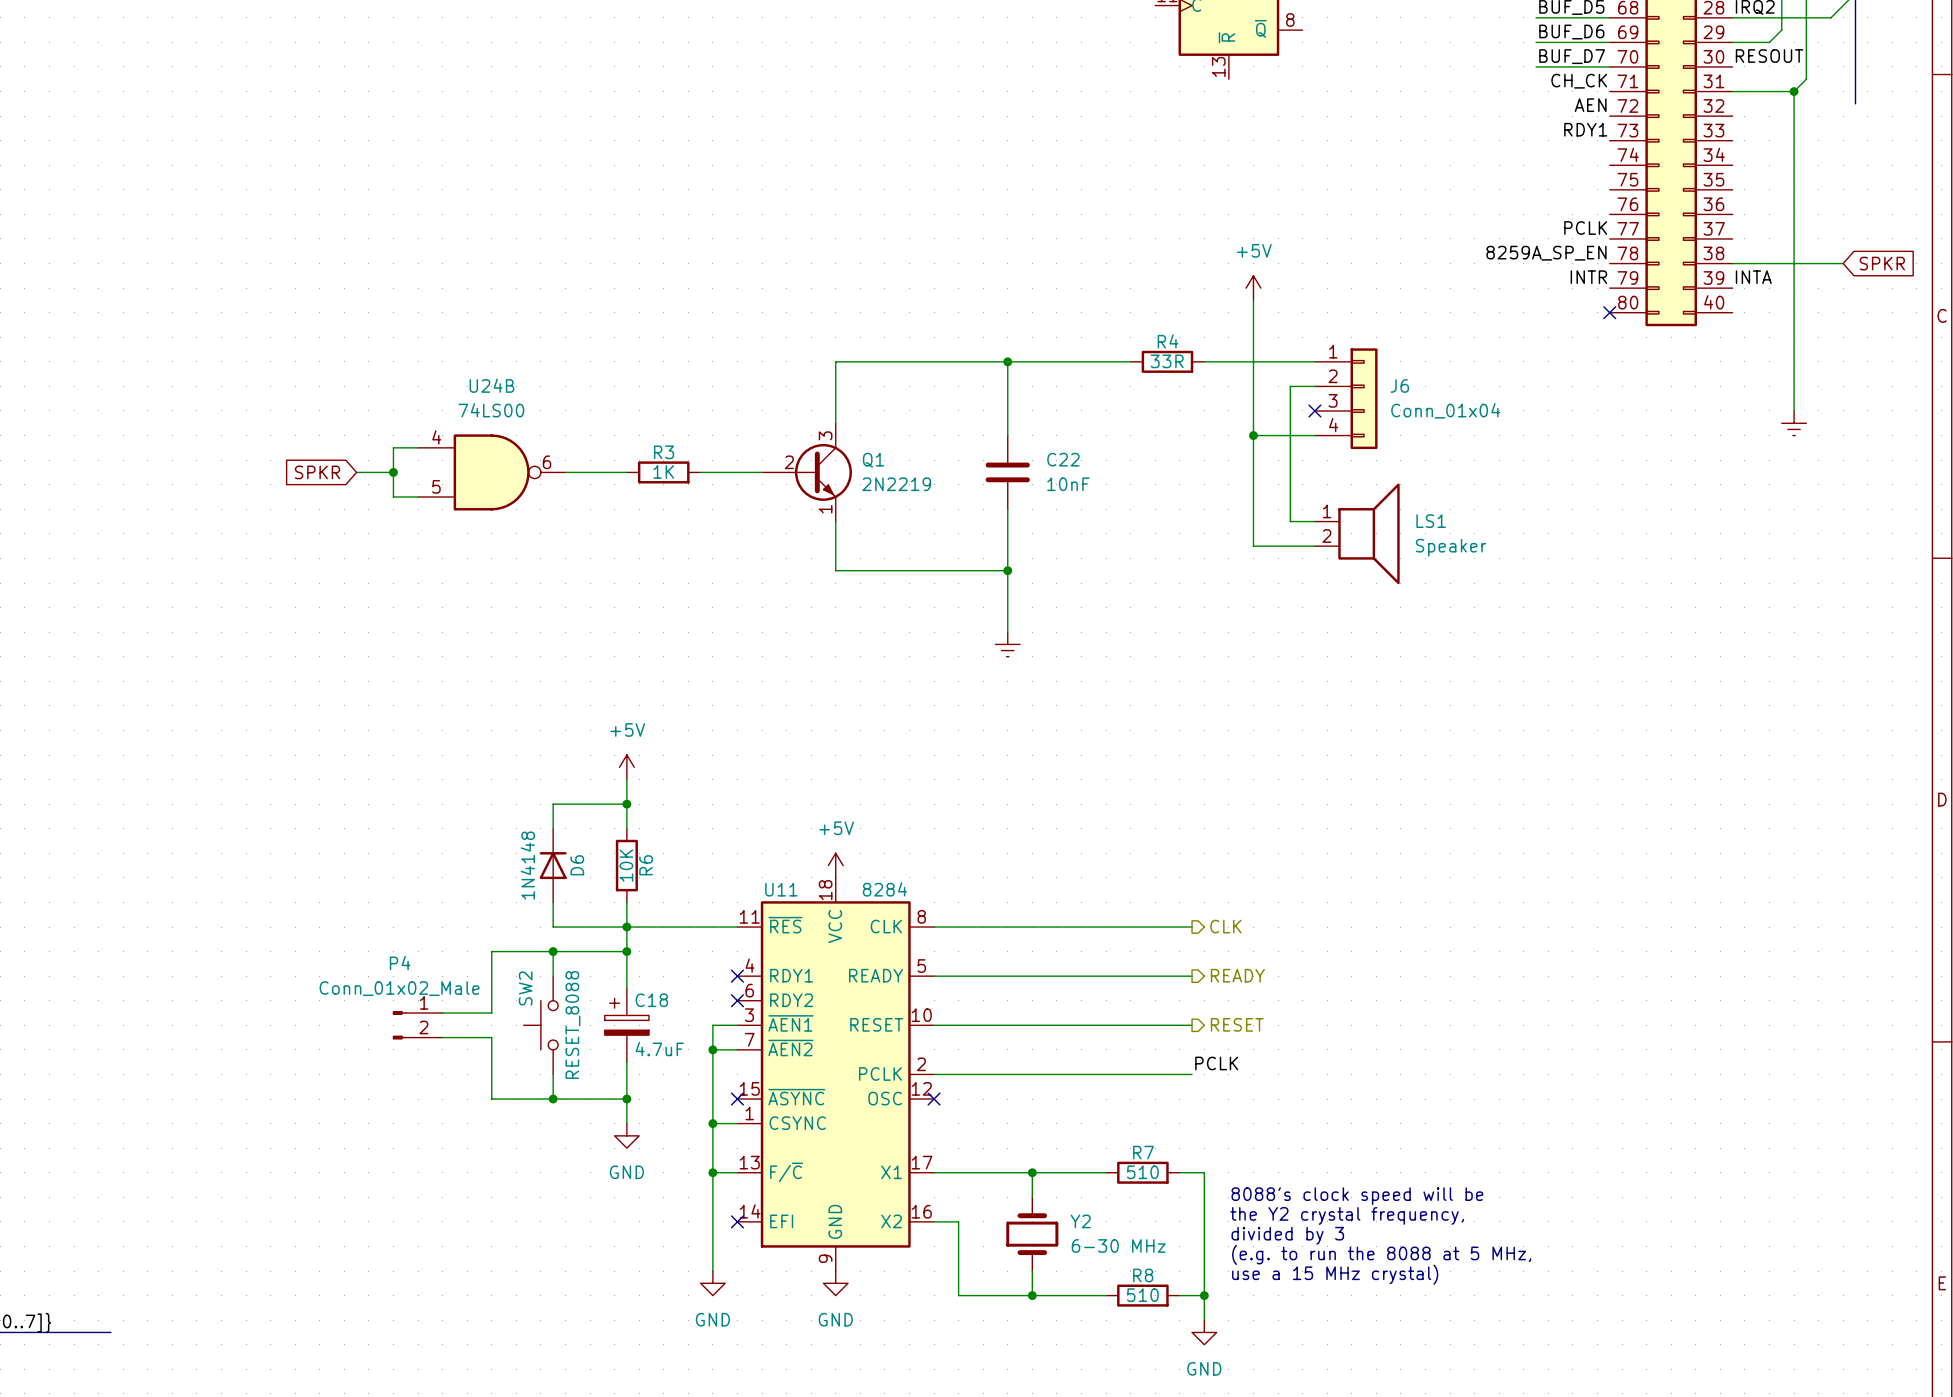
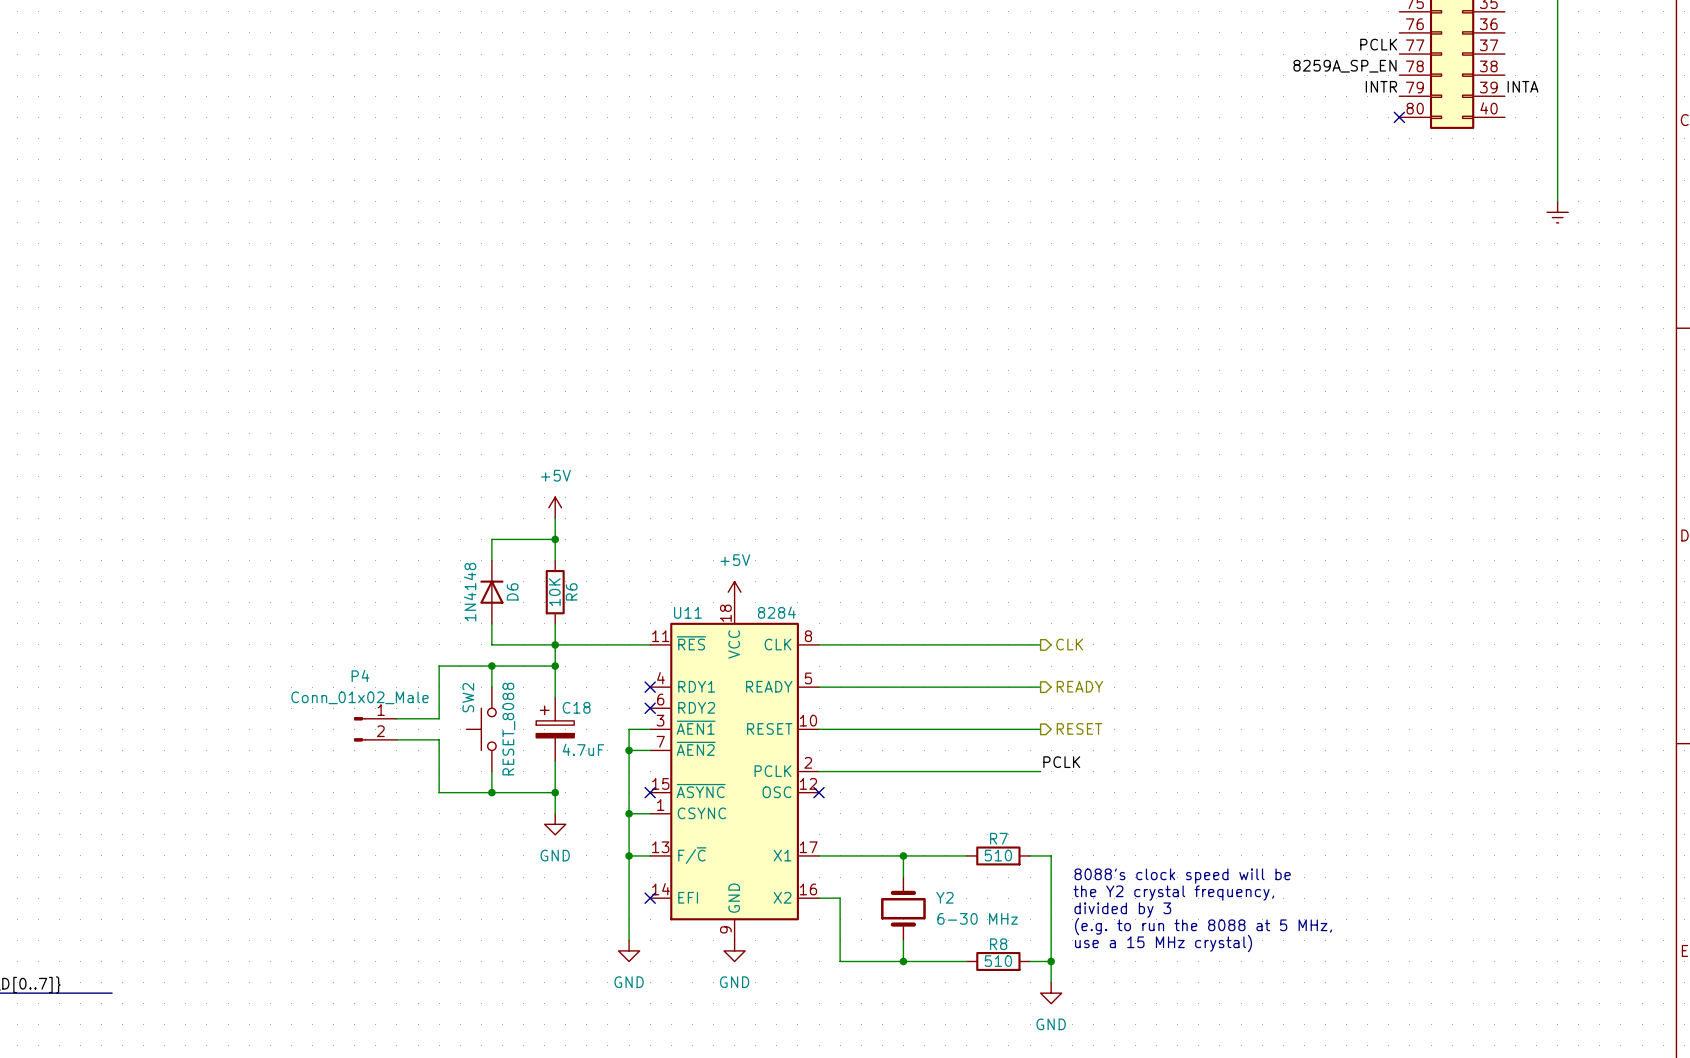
wire: (1732, 263) (1843, 263) -> none
global label: SPKR (1882, 263) -> none
power symbol: +5V (1253, 288) -> none
wire: (1253, 300) (1253, 546) (1314, 546) -> none
wire: (1007, 361) (1007, 435) -> none
junction: (1007, 361) -> none
wire: (1130, 361) (835, 361) (835, 423) -> none
R4: 33R (1167, 361) -> none
wire: (1204, 361) (1314, 361) -> none
wire: (1314, 386) (1290, 386) (1290, 521) (1314, 521) -> none
J6: Conn_01x04 (1346, 398) -> none
no-connect mark: (1314, 410) -> none
wire: (1253, 435) (1314, 435) -> none
junction: (1253, 435) -> none
wire: (418, 447) (393, 447) (393, 497) (418, 497) -> none
global label: SPKR (317, 472) -> none
wire: (356, 472) (393, 472) -> none
junction: (393, 472) -> none
U24B: 74LS00 (491, 472) -> none
wire: (565, 472) (626, 472) -> none
R3: 1K (663, 472) -> none
wire: (700, 472) (762, 472) -> none
Q1: 2N2219 (806, 472) -> none
C22: 10nF (1007, 472) -> none
wire: (1007, 509) (1007, 632) -> none
wire: (835, 521) (835, 570) (1007, 570) -> none
LS1: Speaker (1357, 533) -> none
junction: (1007, 570) -> none
power symbol: (1007, 644) -> none

